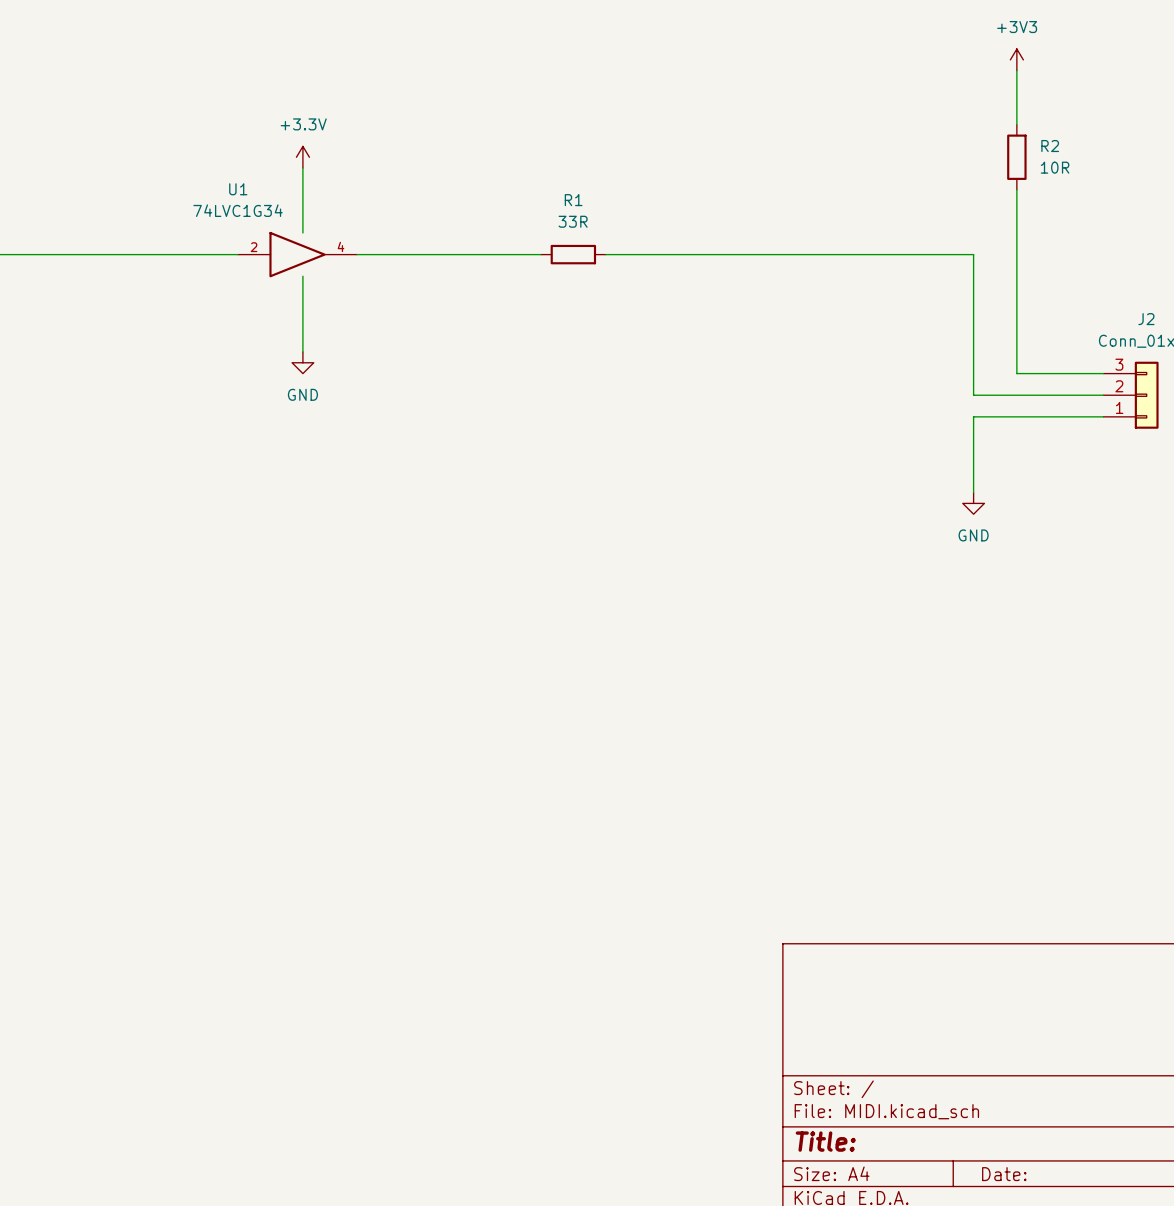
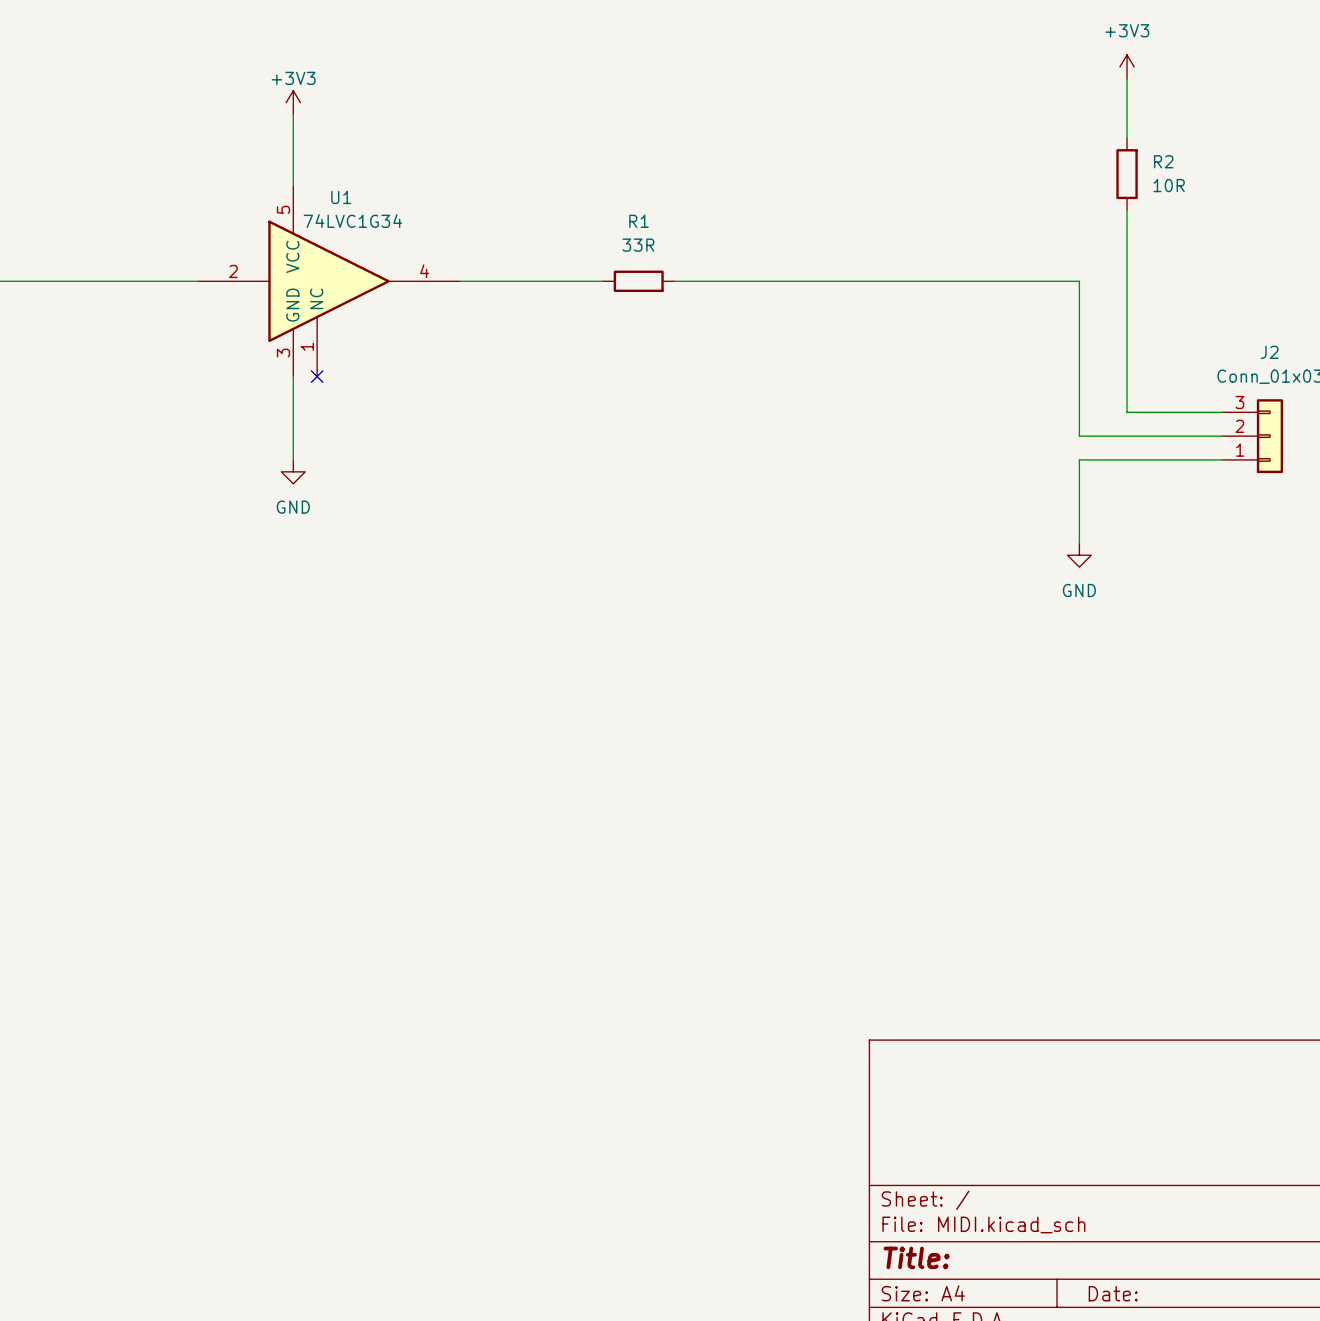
power symbol: none -> +3V3 (293, 102)
power symbol: +3.3V (302, 157) -> none
wire: (302, 168) (302, 232) -> (293, 114) (293, 186)
U1 name position: U1 (238, 189) -> U1 (341, 197)
U1 value position: 74LVC1G34 (238, 210) -> 74LVC1G34 (352, 221)
U1 symbol: [238, 231, 358, 278] -> [198, 186, 461, 377]
wire: (302, 276) (302, 351) -> (293, 376) (293, 459)
no-connect mark: none -> (317, 376)
power symbol position: GND (302, 362) -> GND (293, 471)

